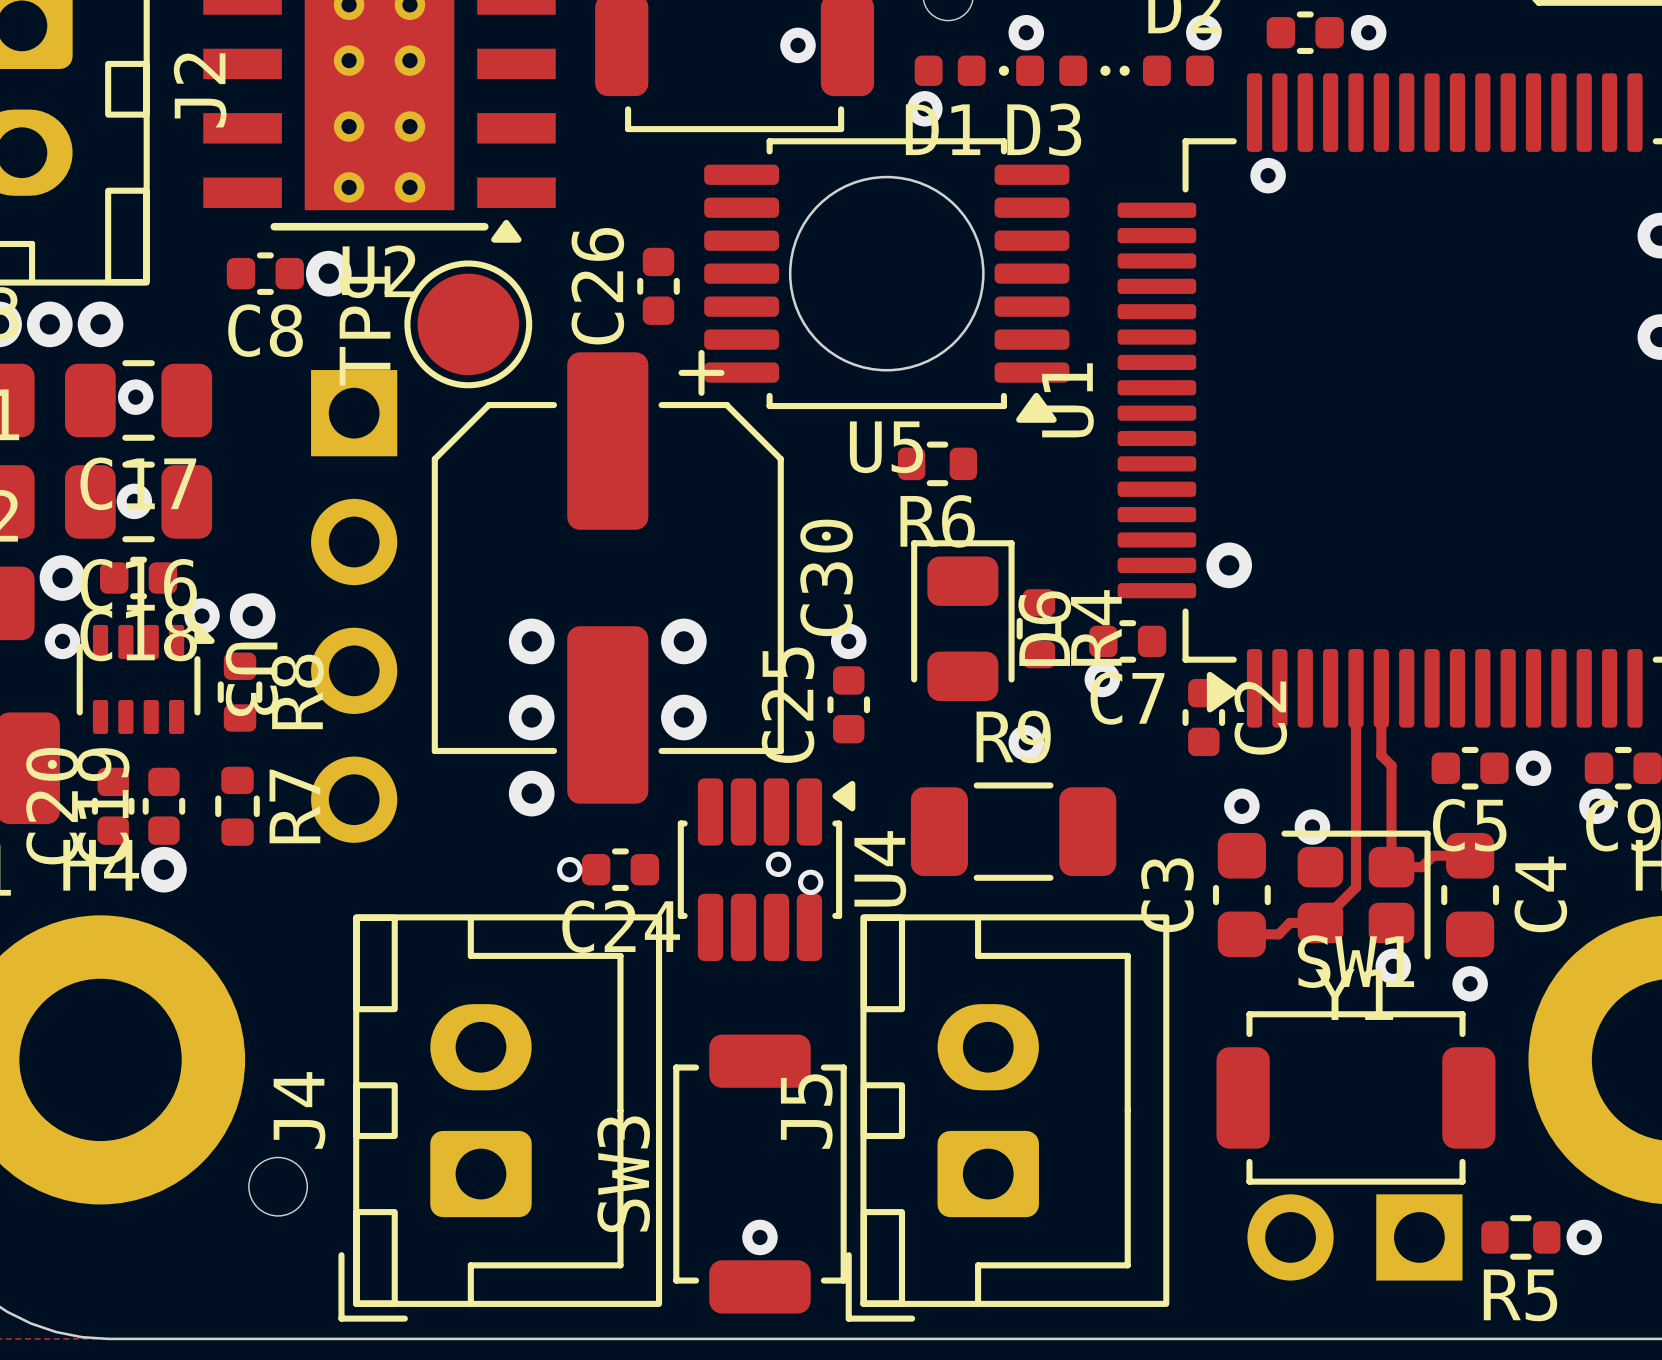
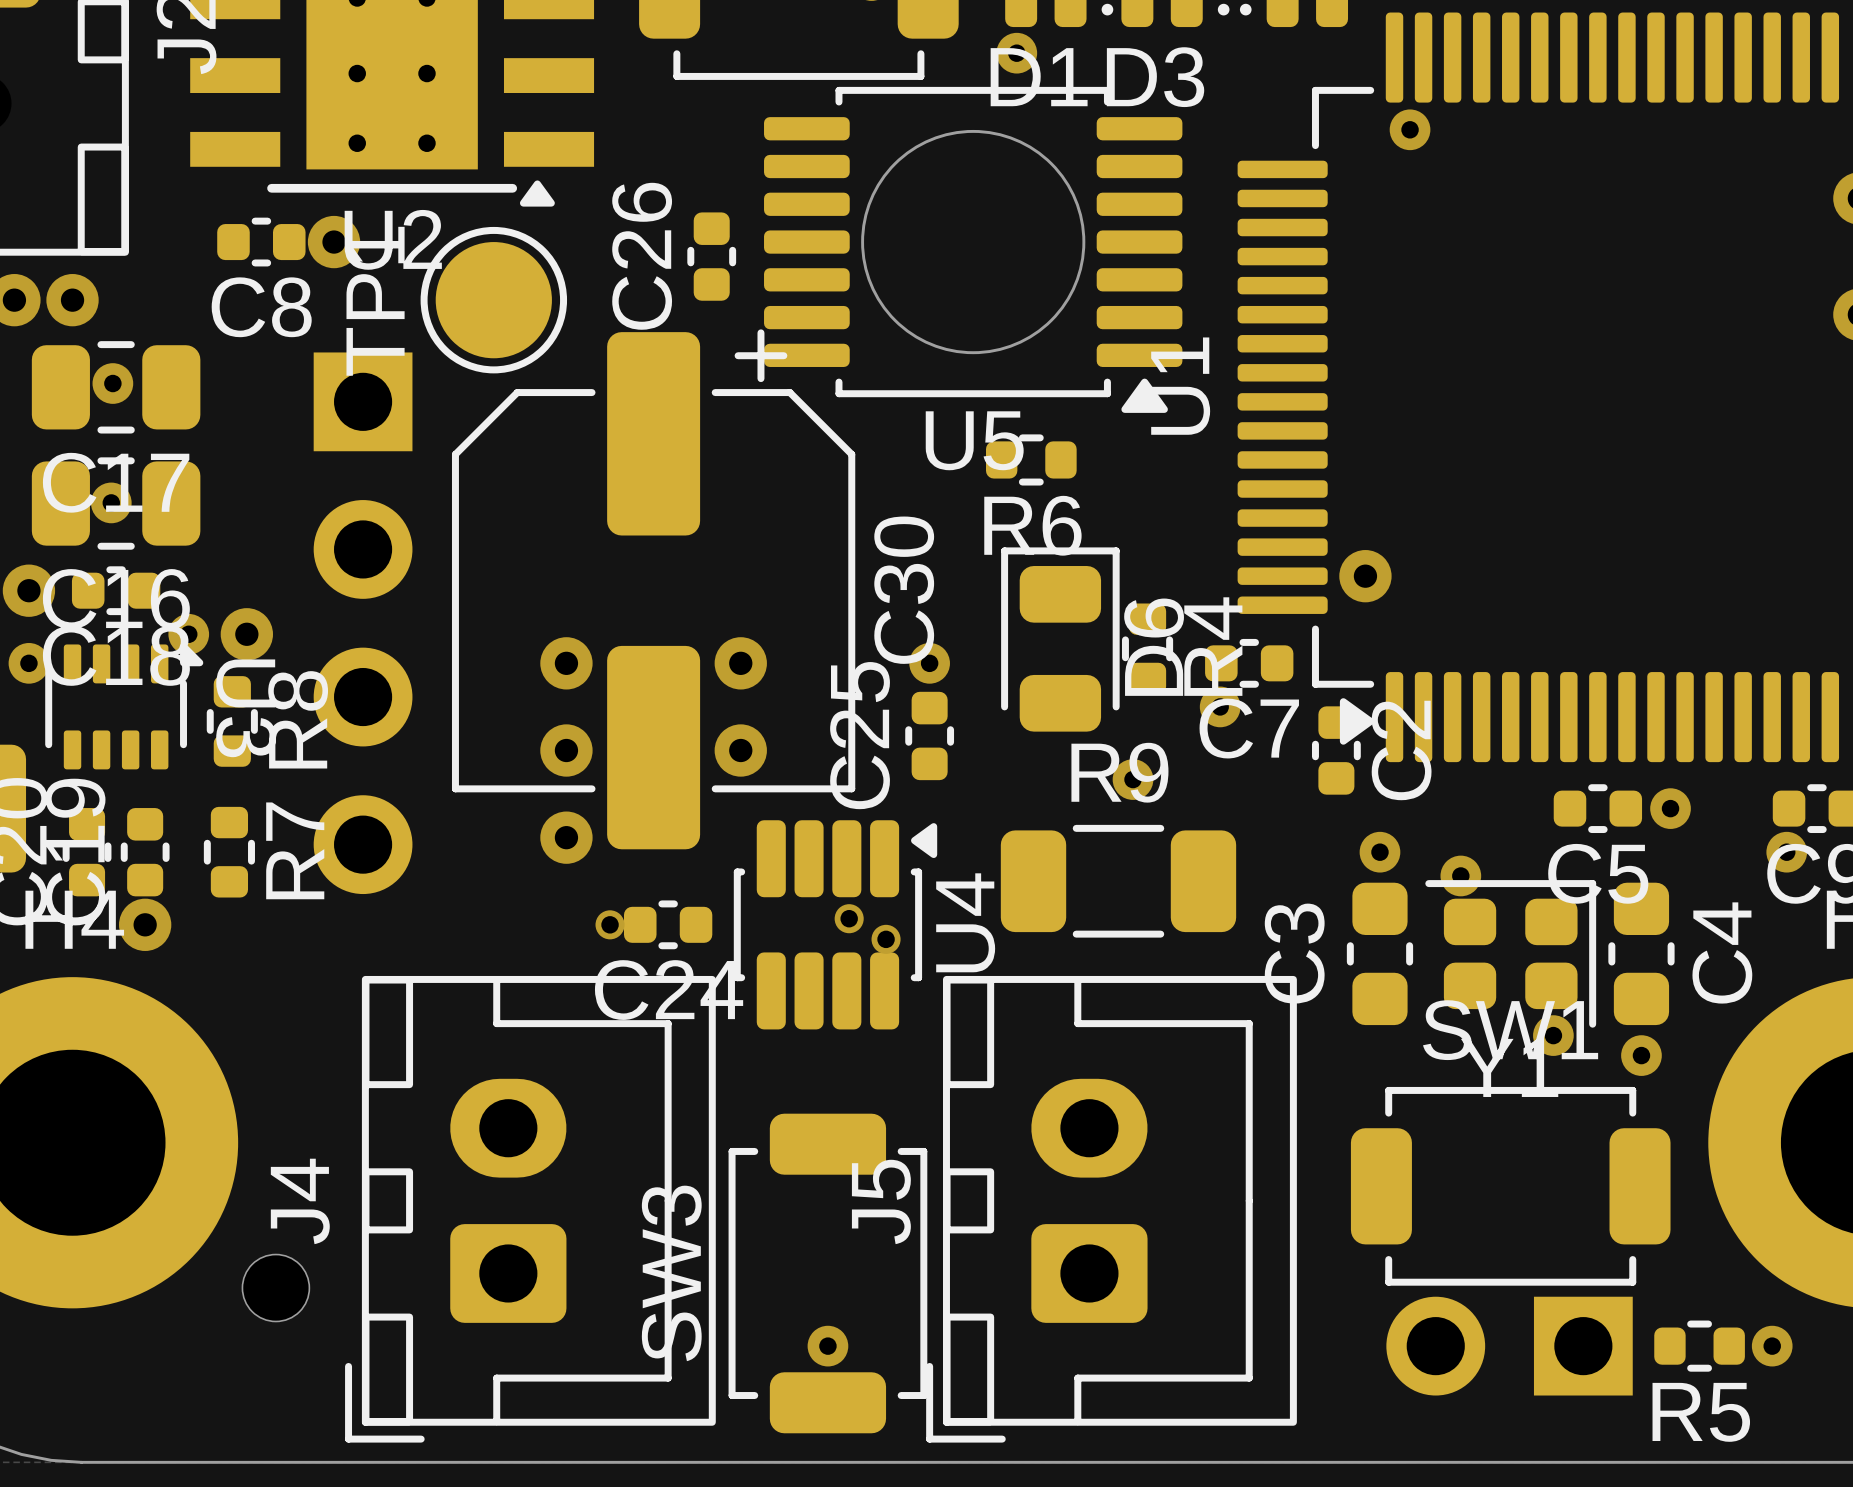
track: (1355, 688) (1355, 887) (1320, 922) (1290, 922) (1278, 934) (1241, 934) -> none
track: (1381, 688) (1381, 755) (1391, 765) (1391, 867) (1421, 867) (1433, 855) (1470, 855) -> none
C5 position: (1470, 768) -> (1597, 808)
via position: (1533, 768) -> (1670, 808)

